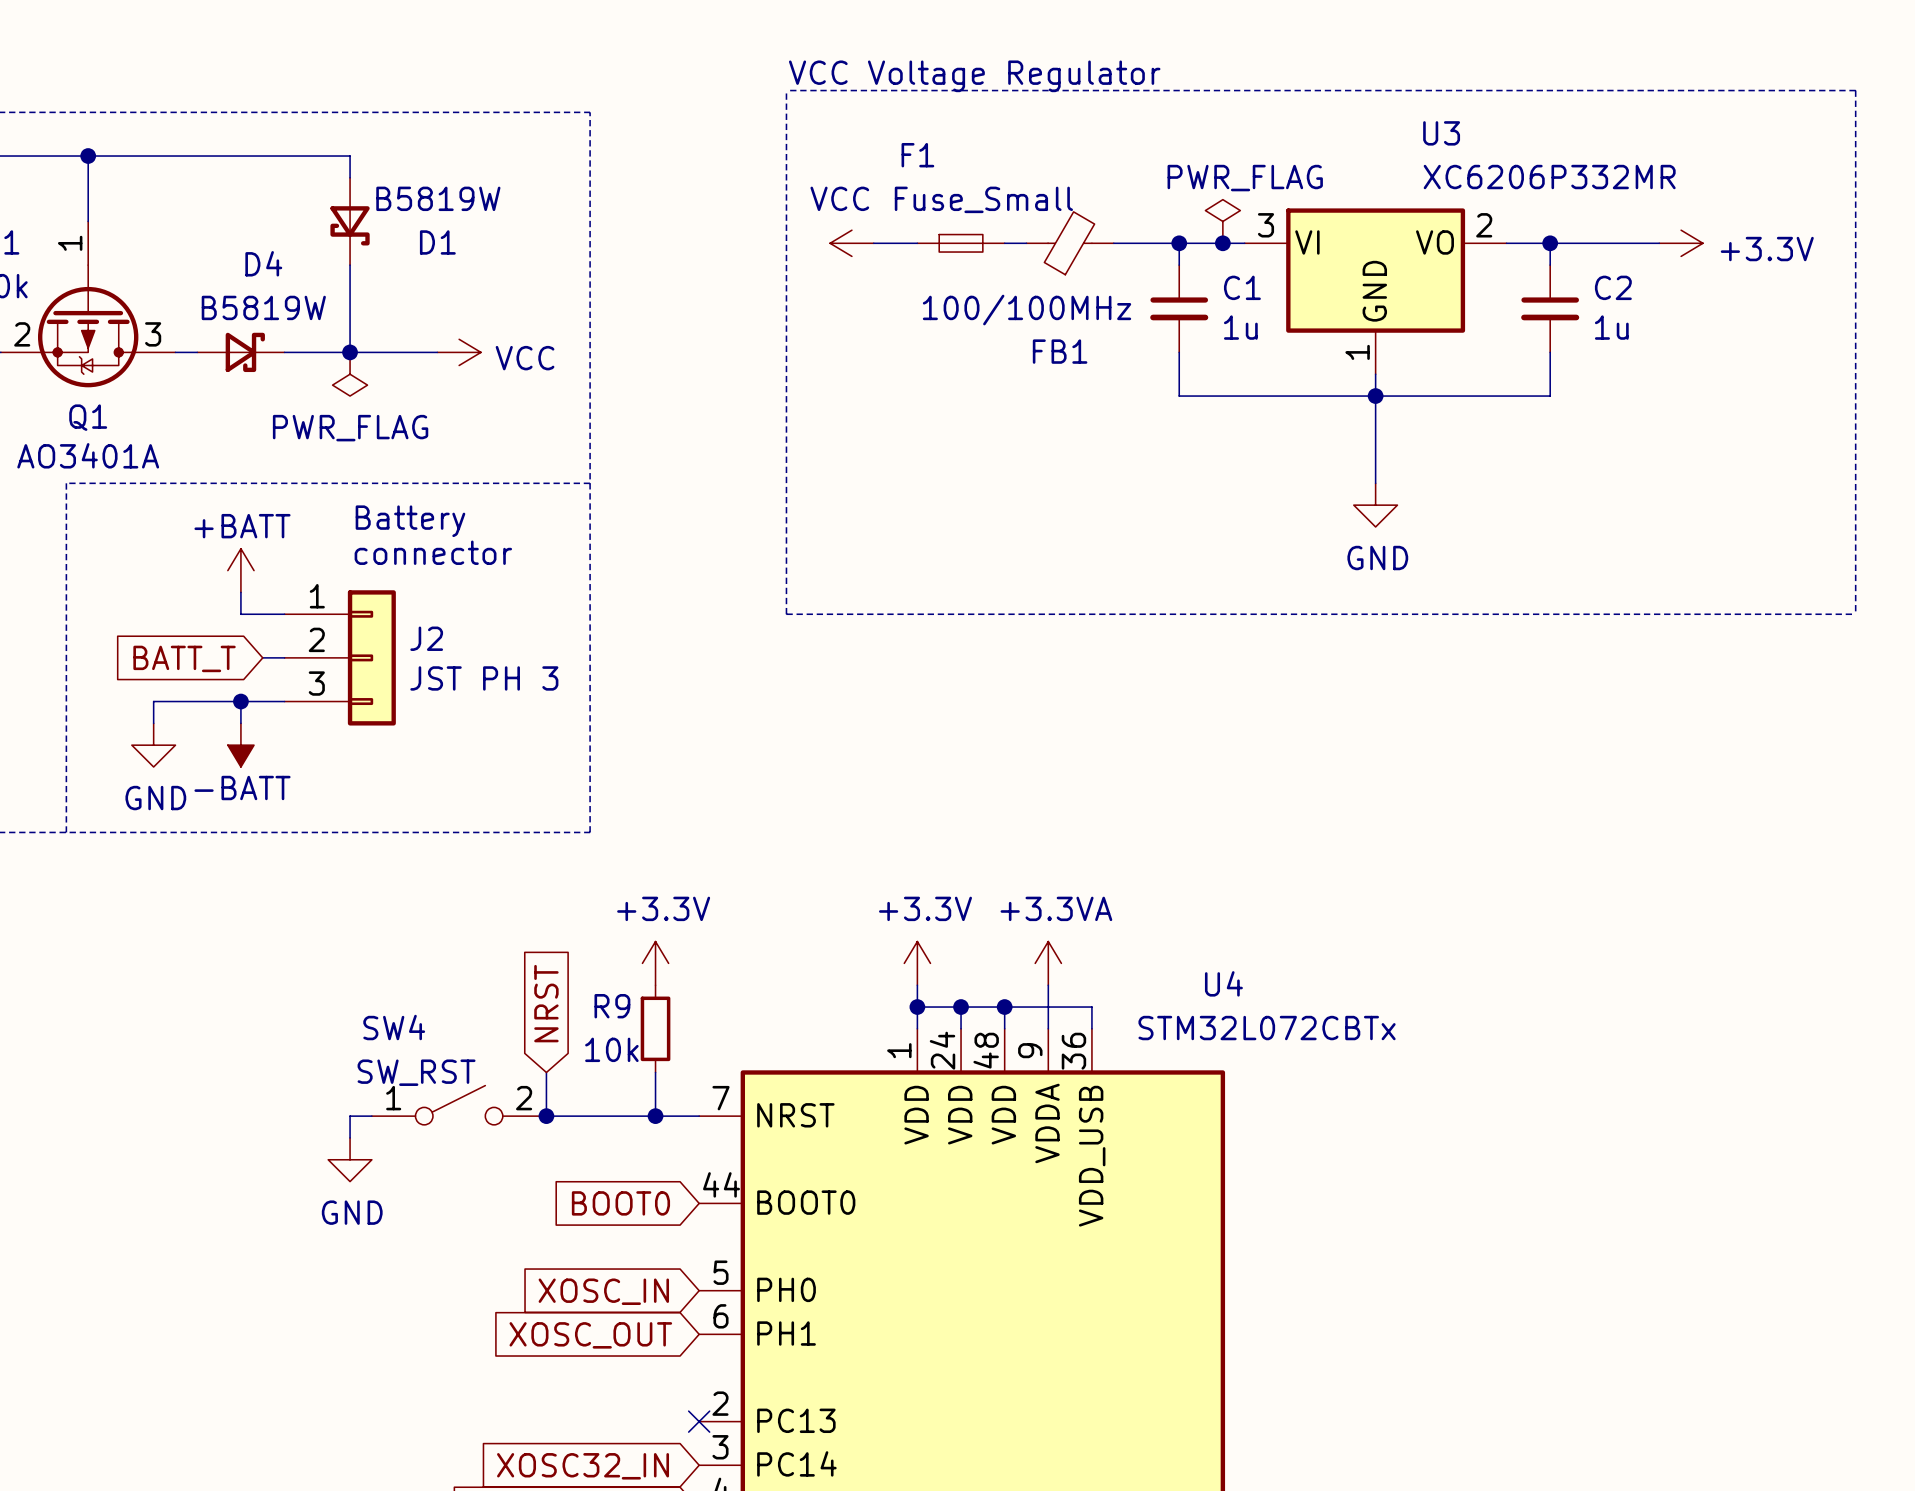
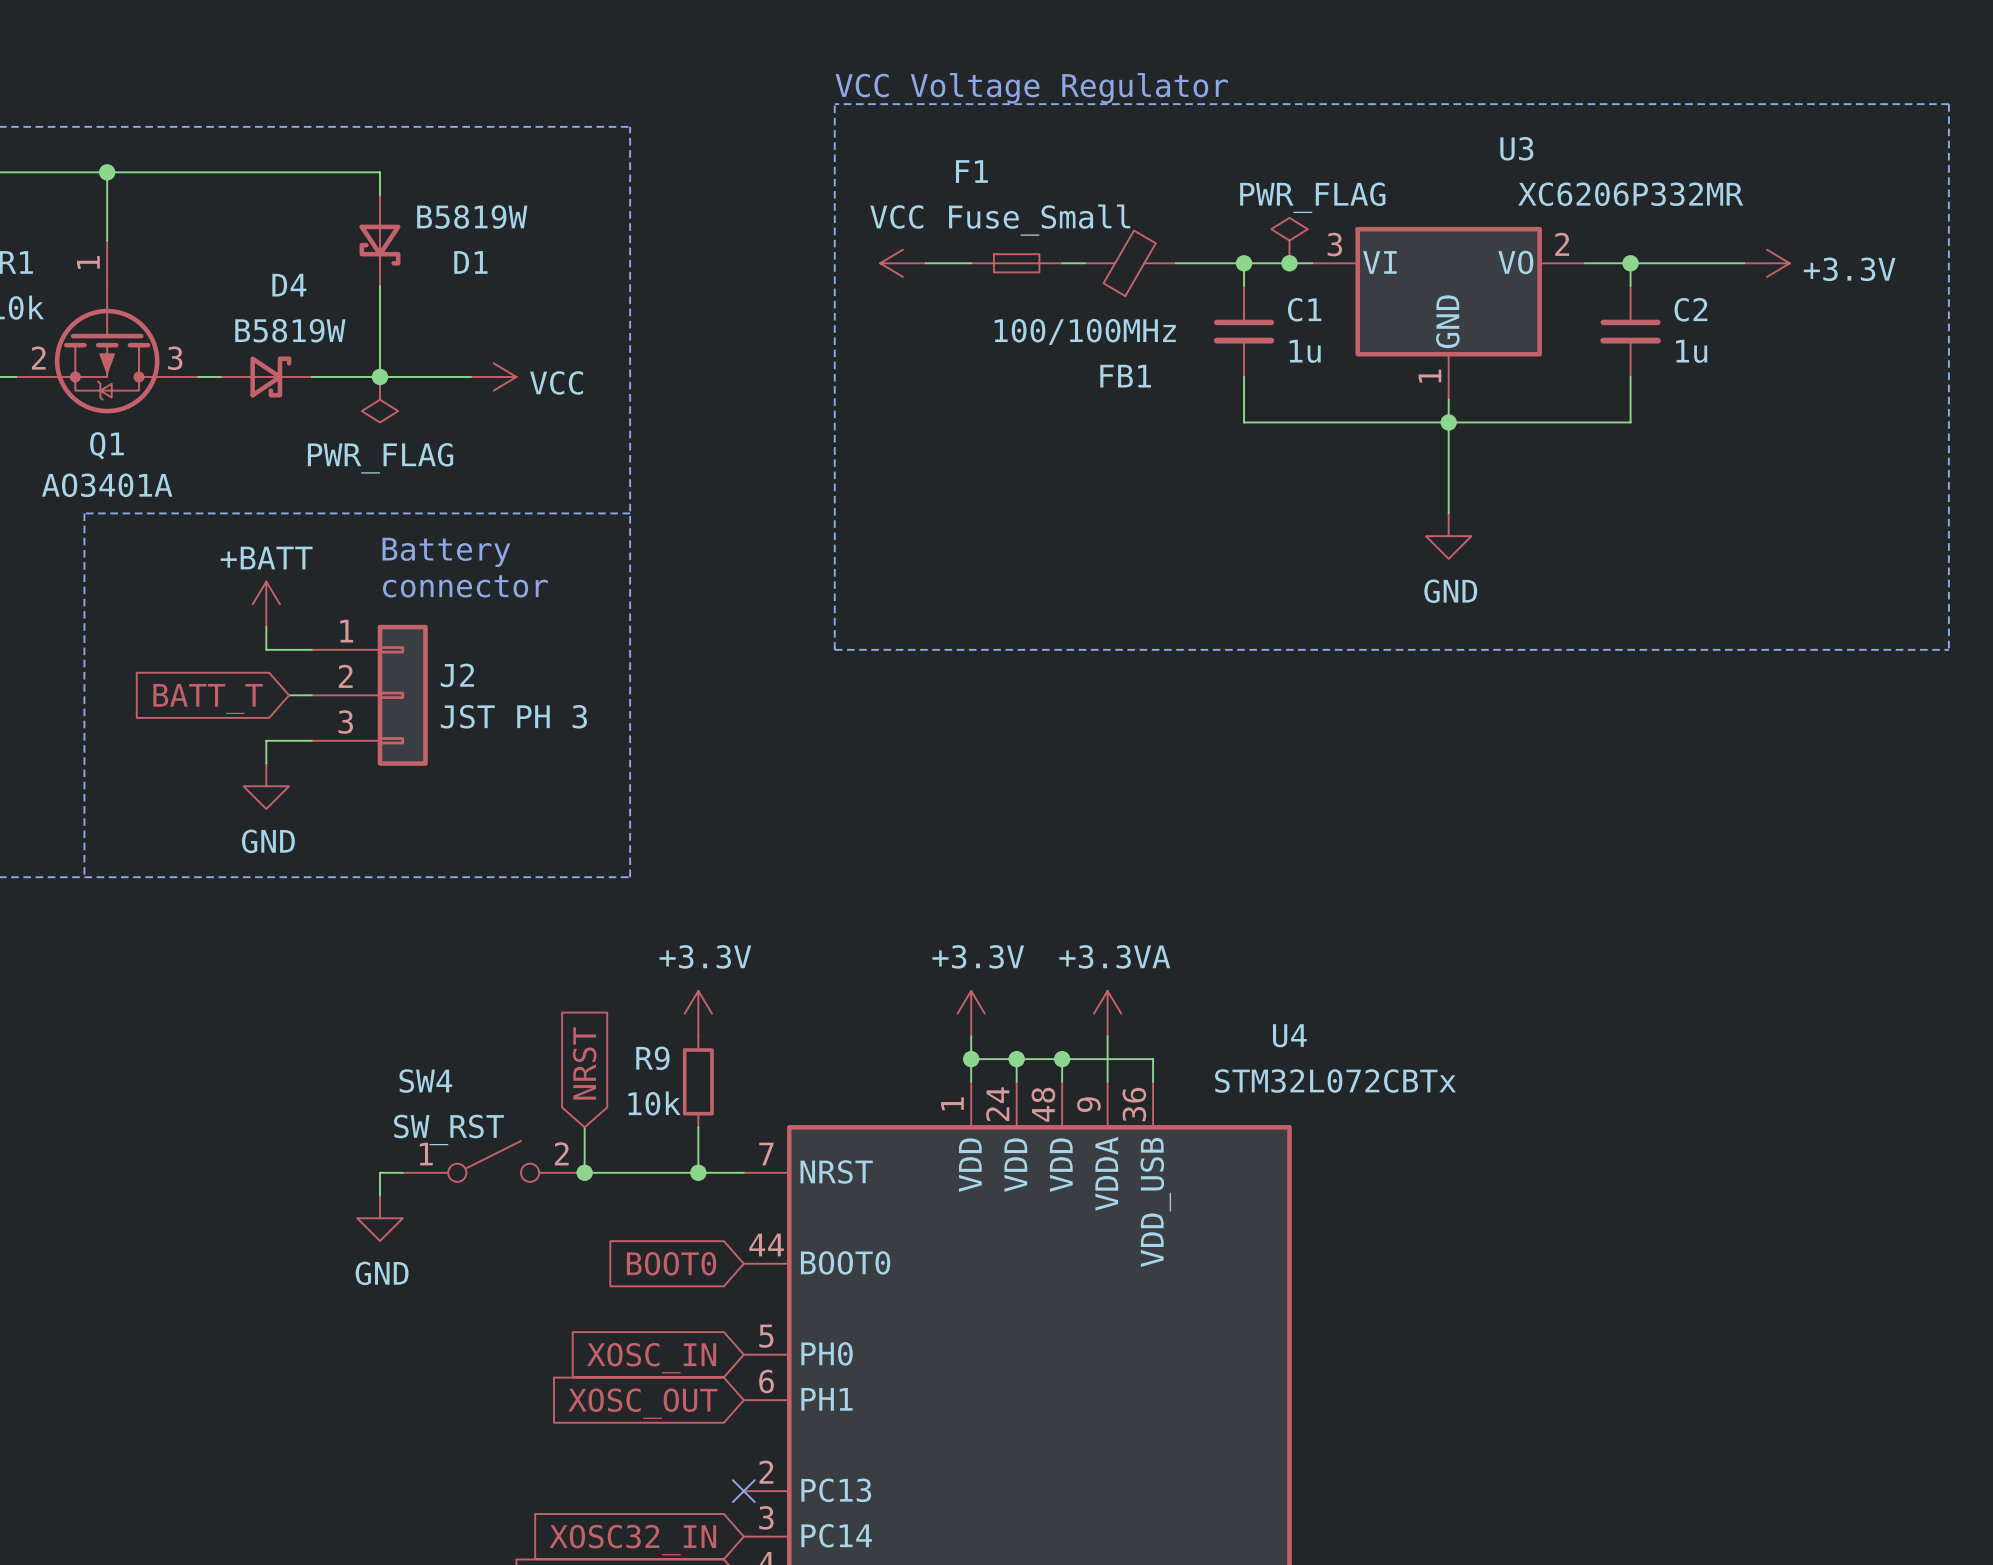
wire: (240, 701) (153, 701) (153, 723) -> none
junction: (240, 701) -> none
power symbol: GND (153, 745) -> none
power symbol: -BATT (240, 745) -> GND (266, 786)

